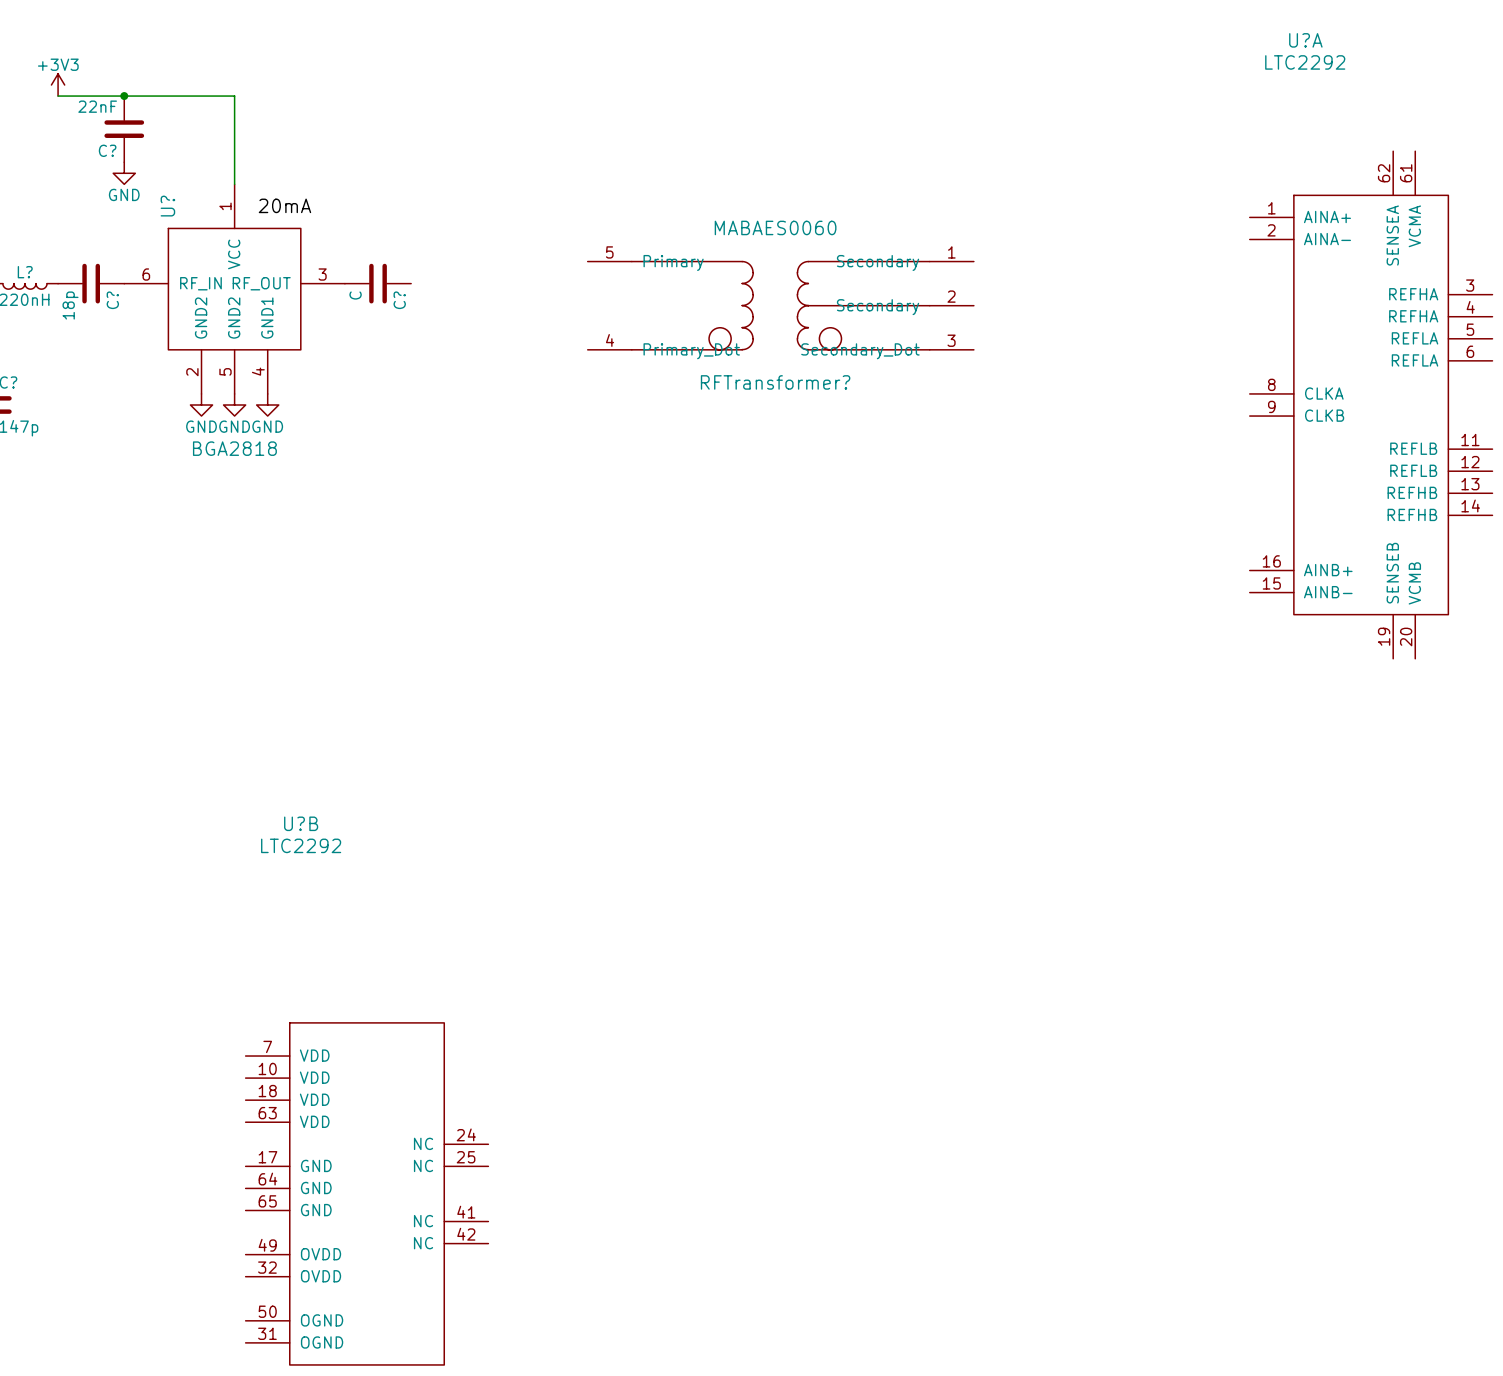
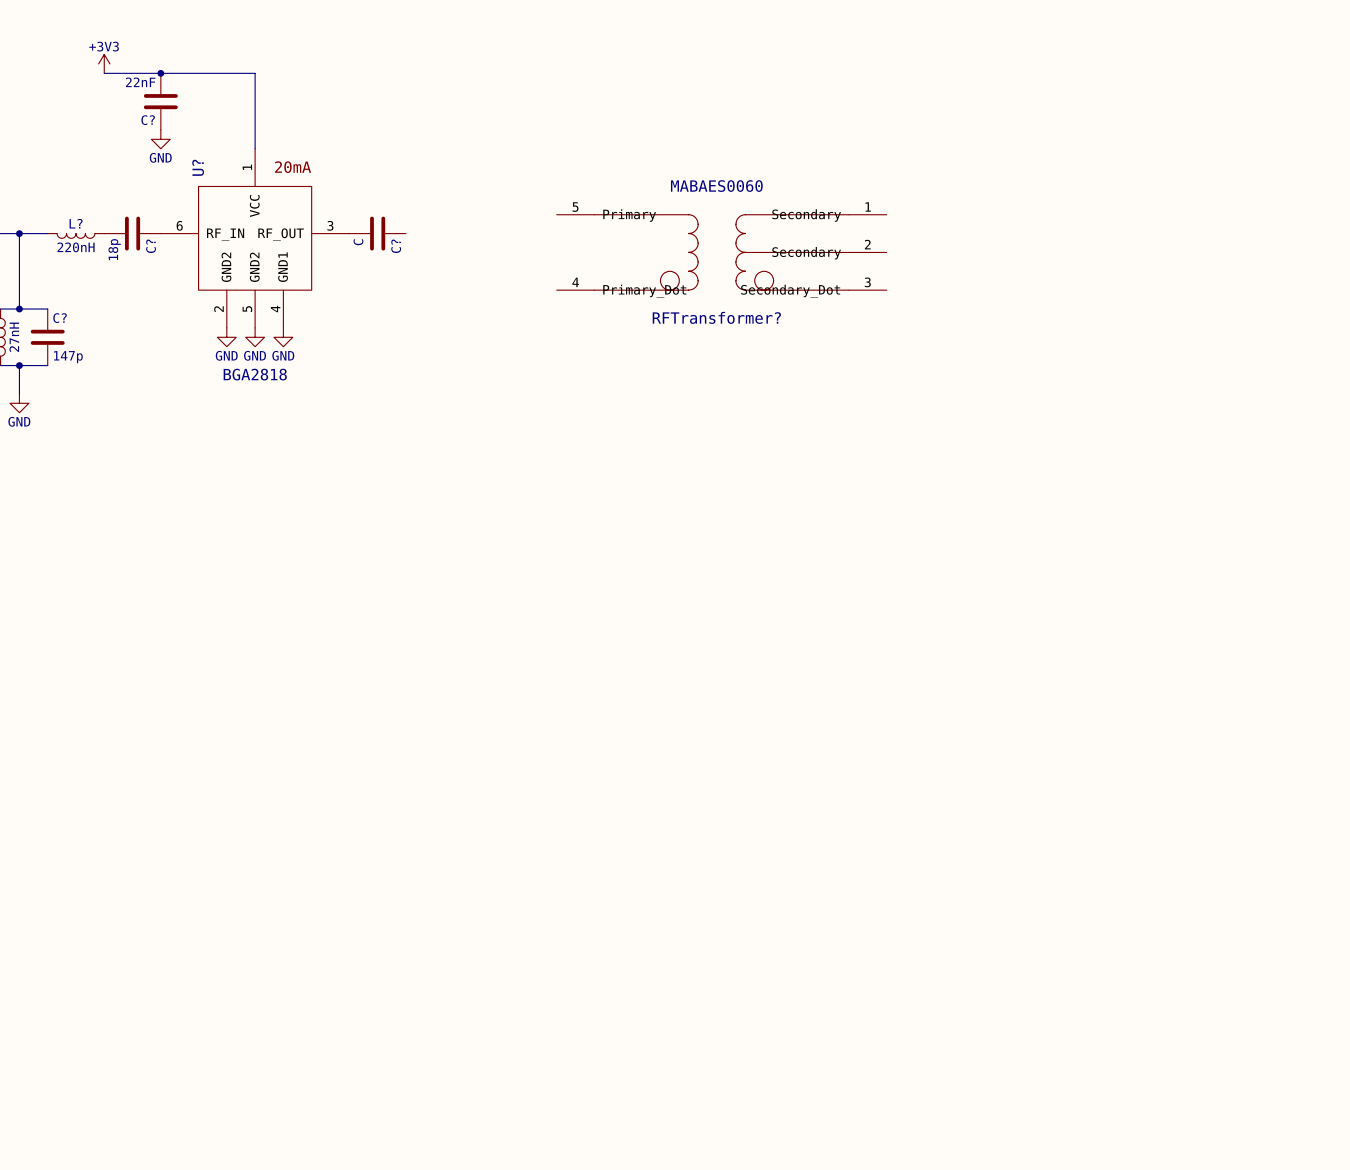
U?A: LTC2292 (1371, 405) -> none
U?B: LTC2292 (367, 1193) -> none

